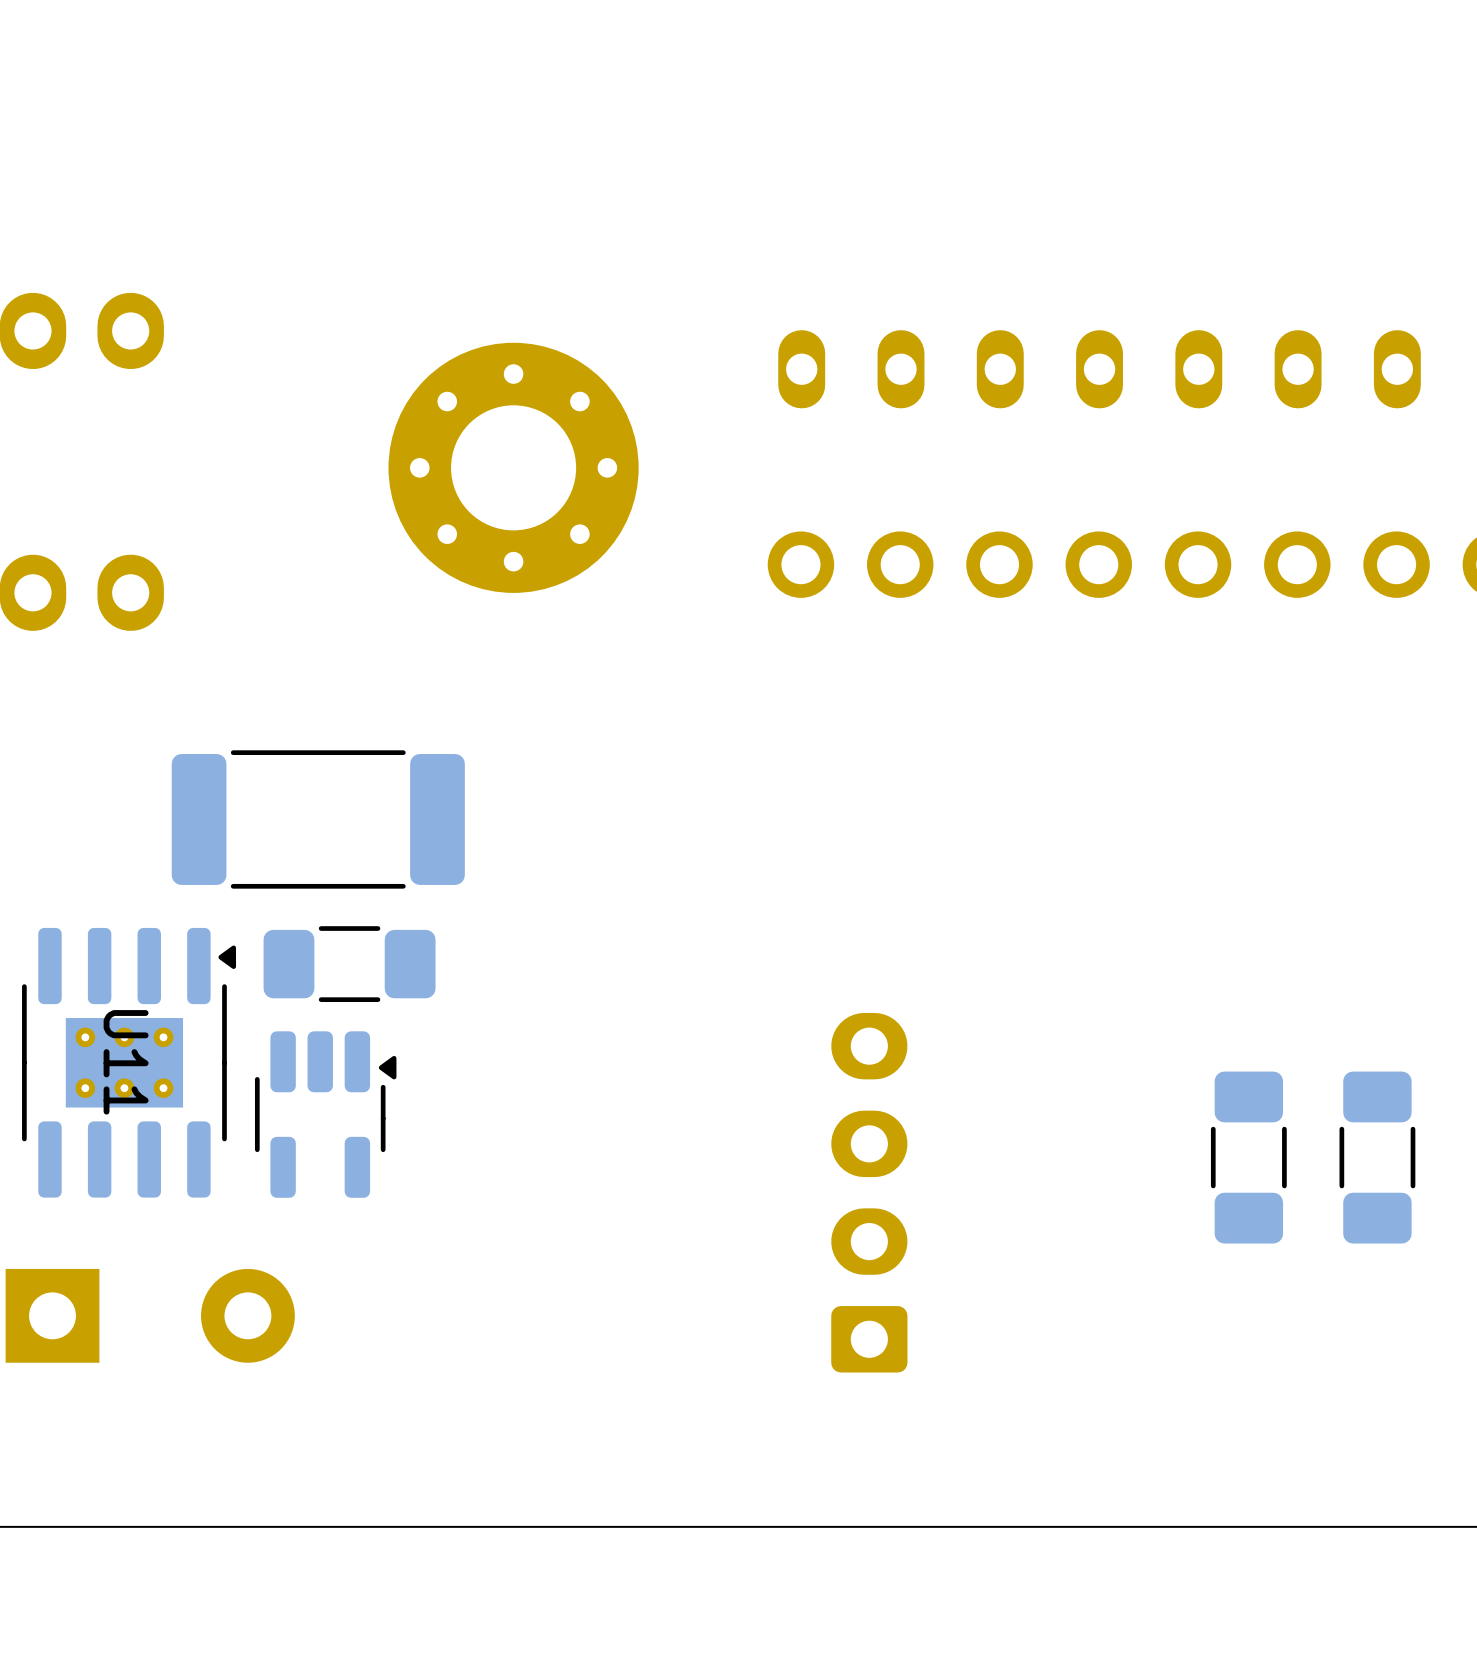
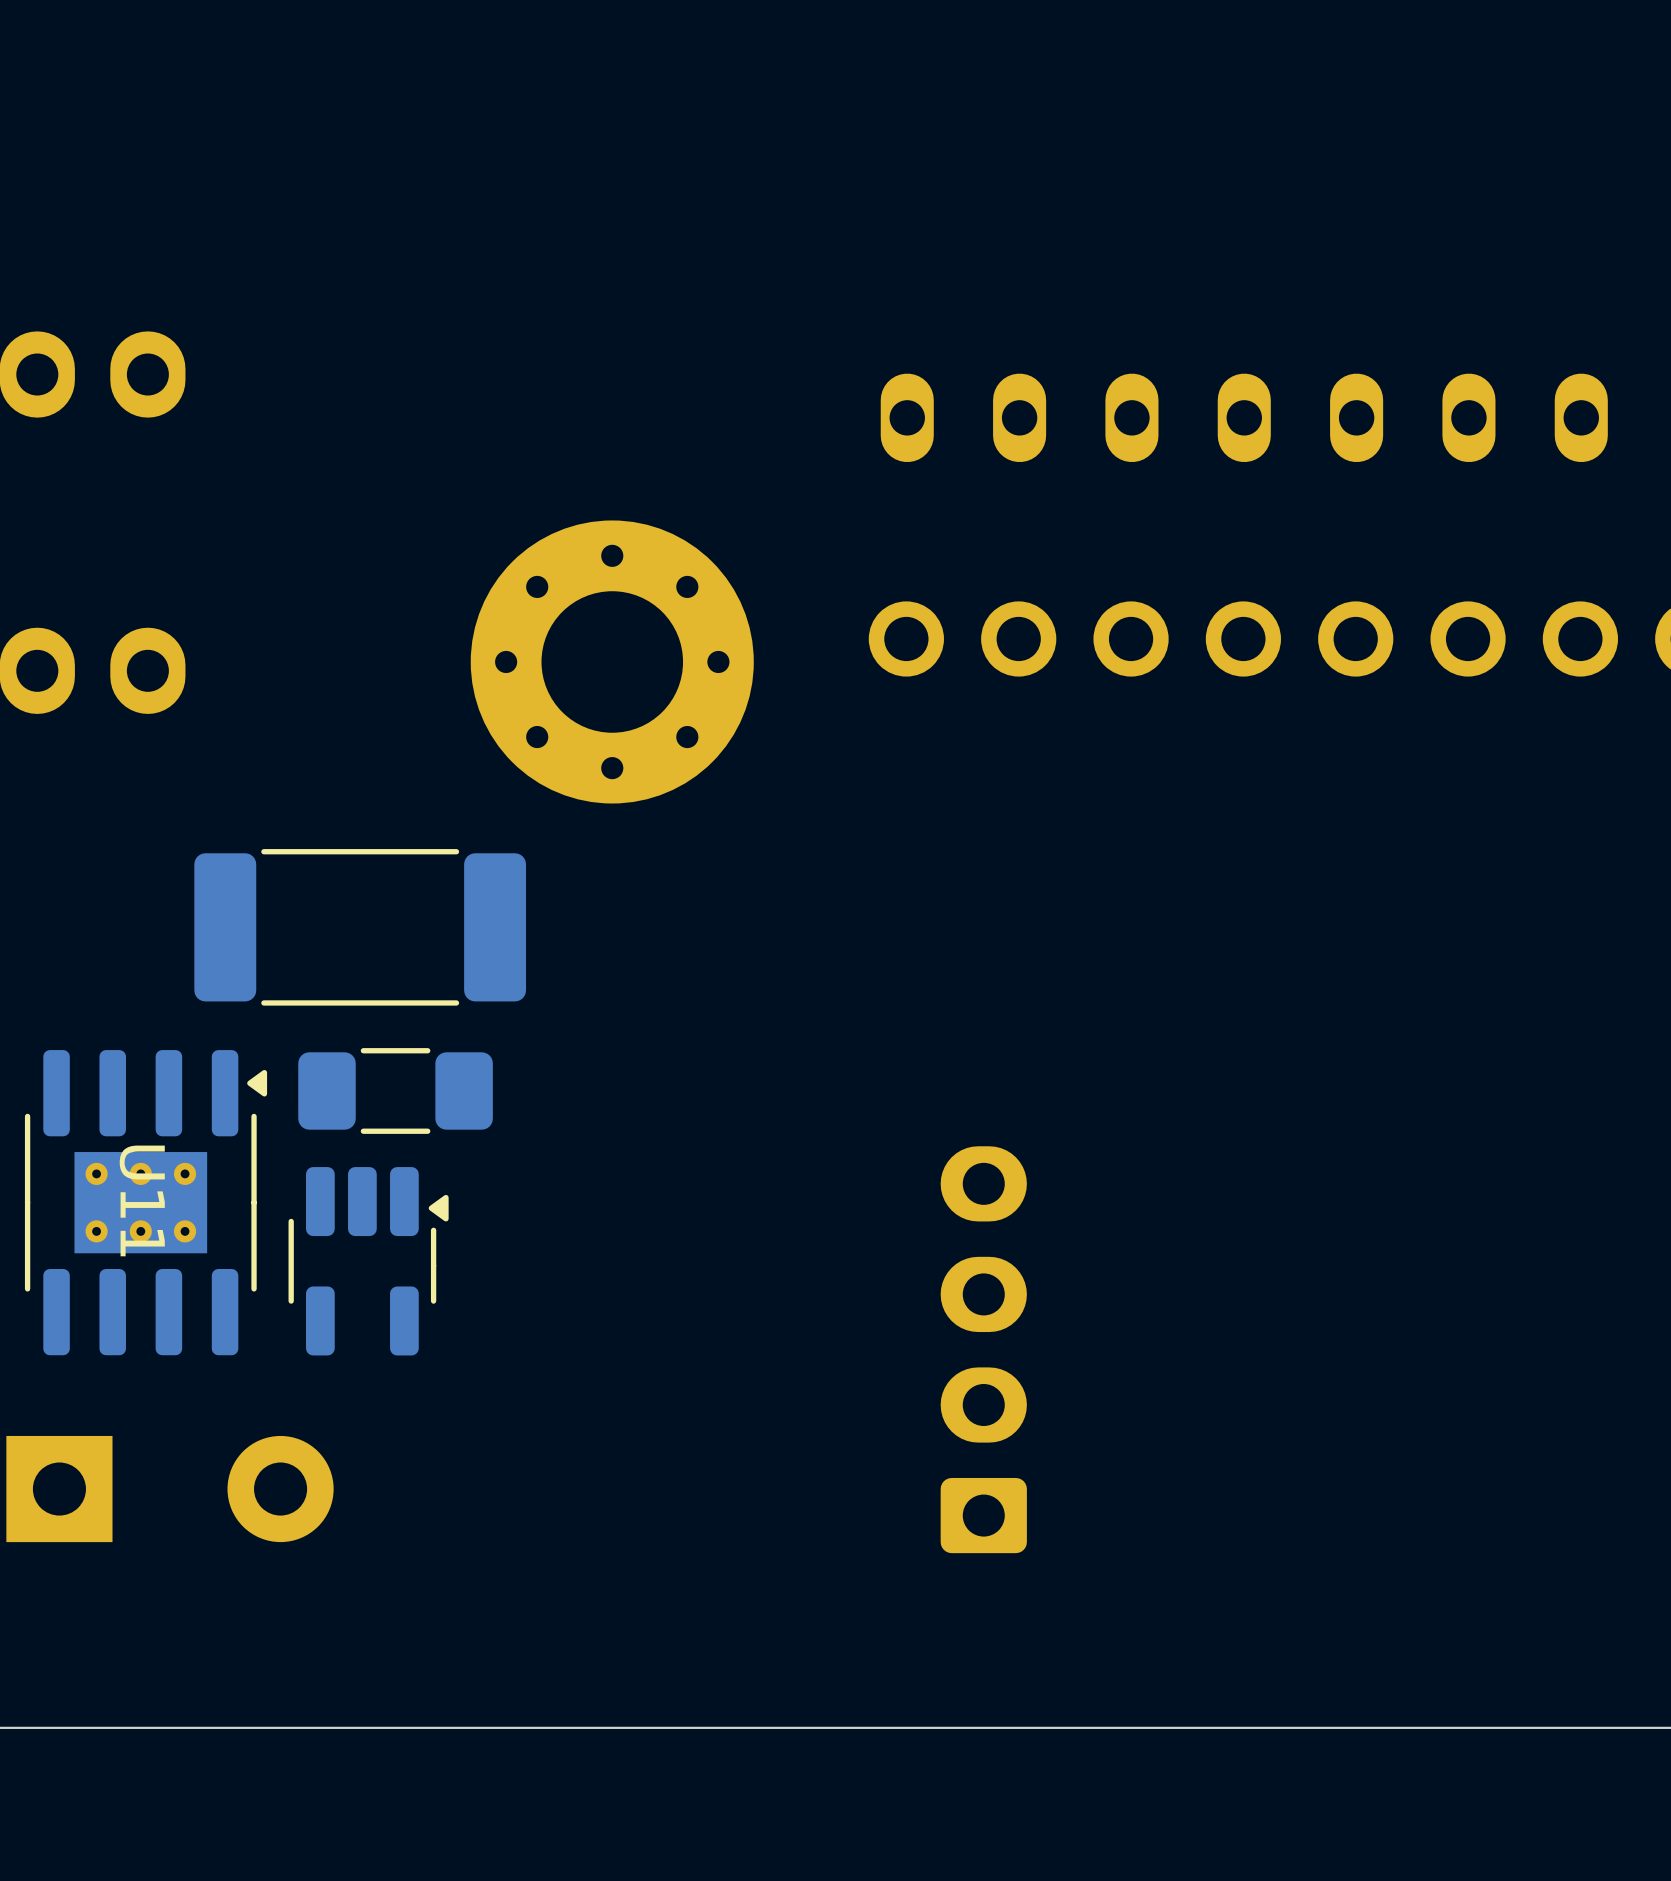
part position: (513, 467) -> (612, 661)
part: (1248, 1157) -> none
part: (1377, 1157) -> none

